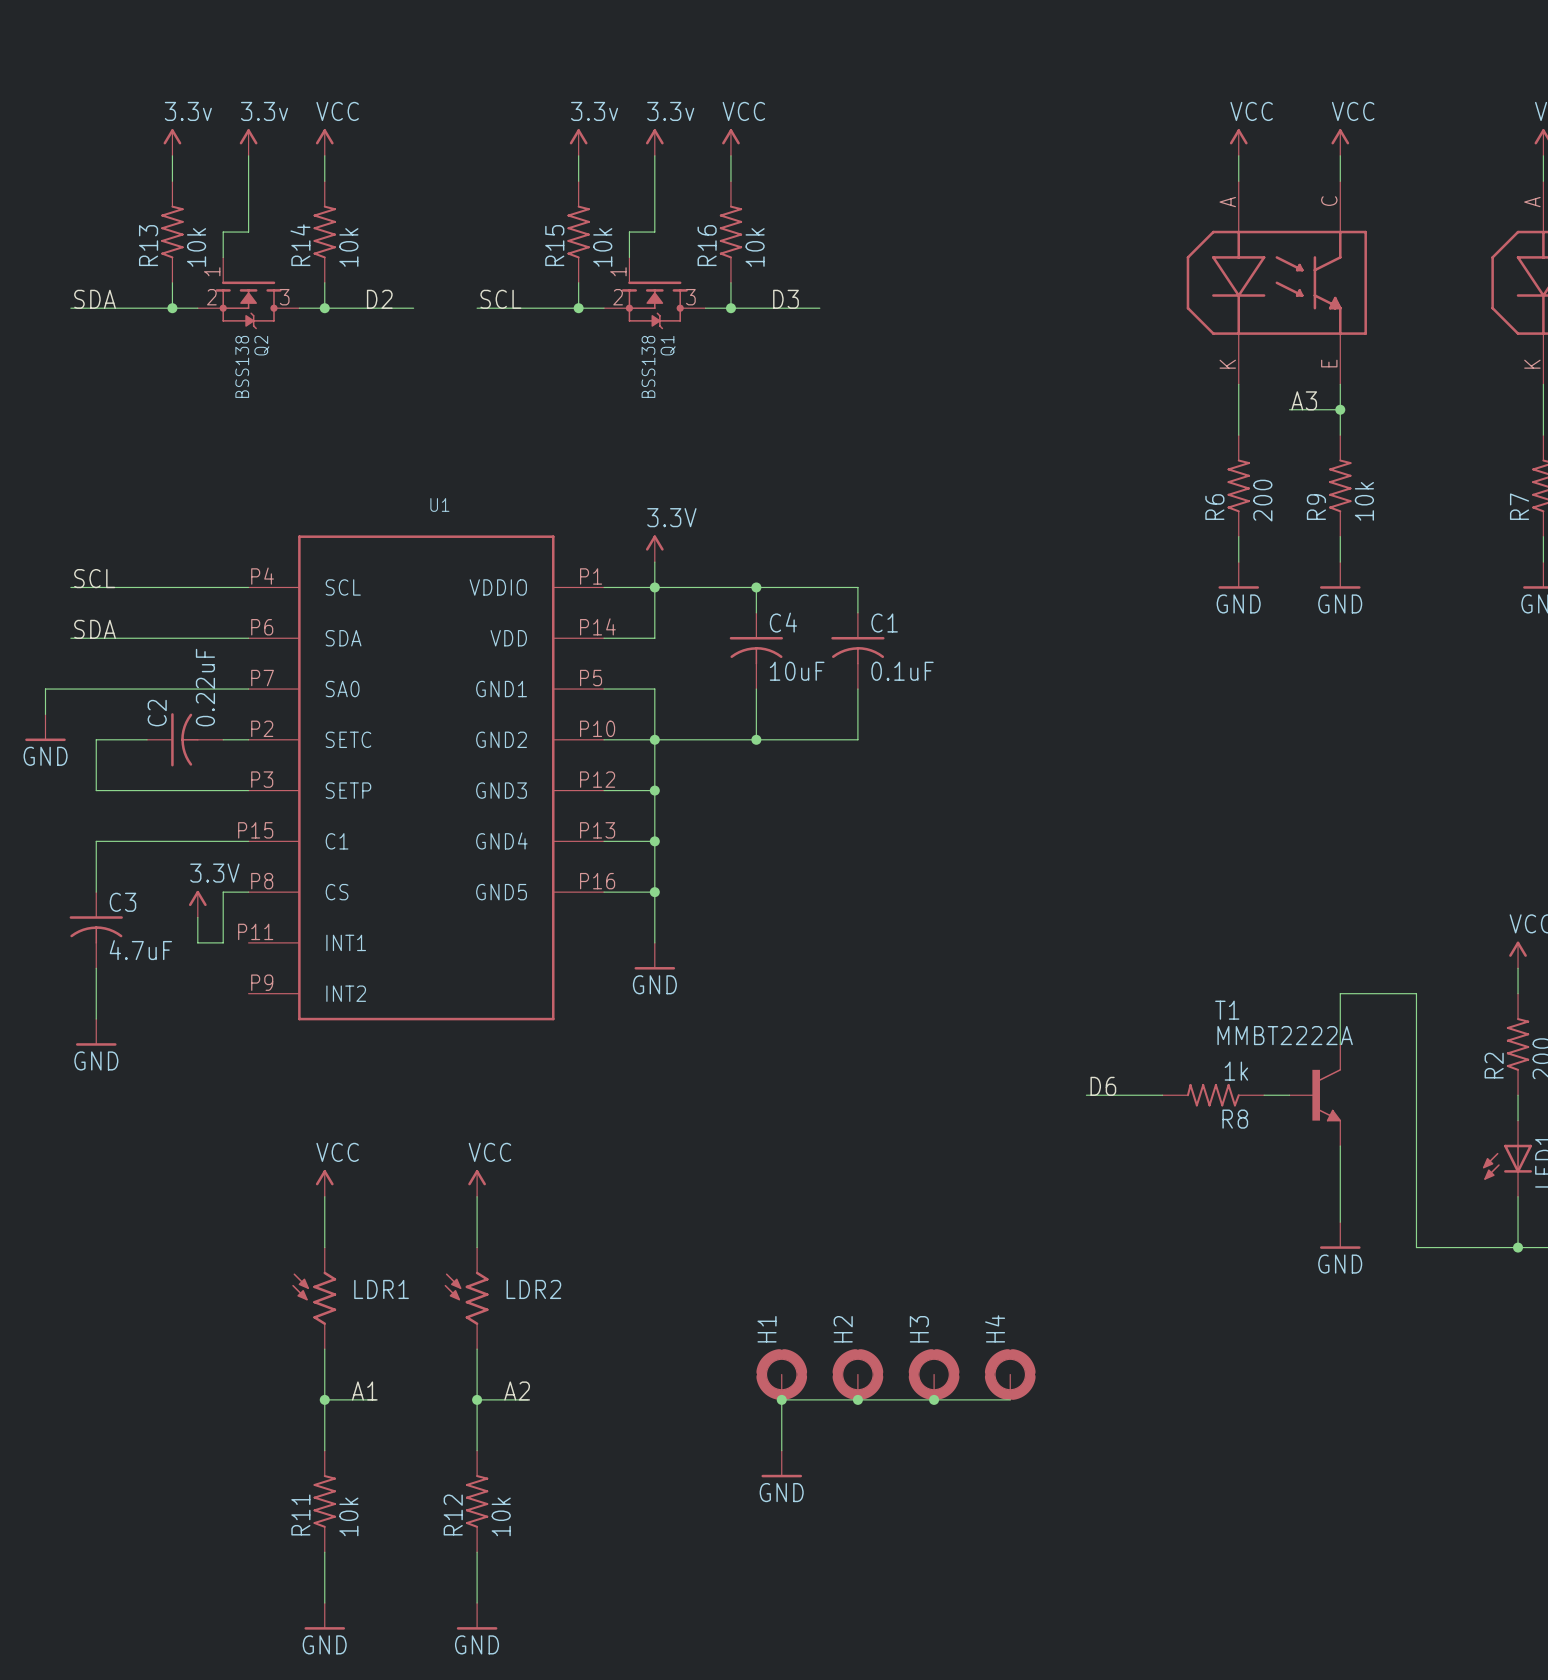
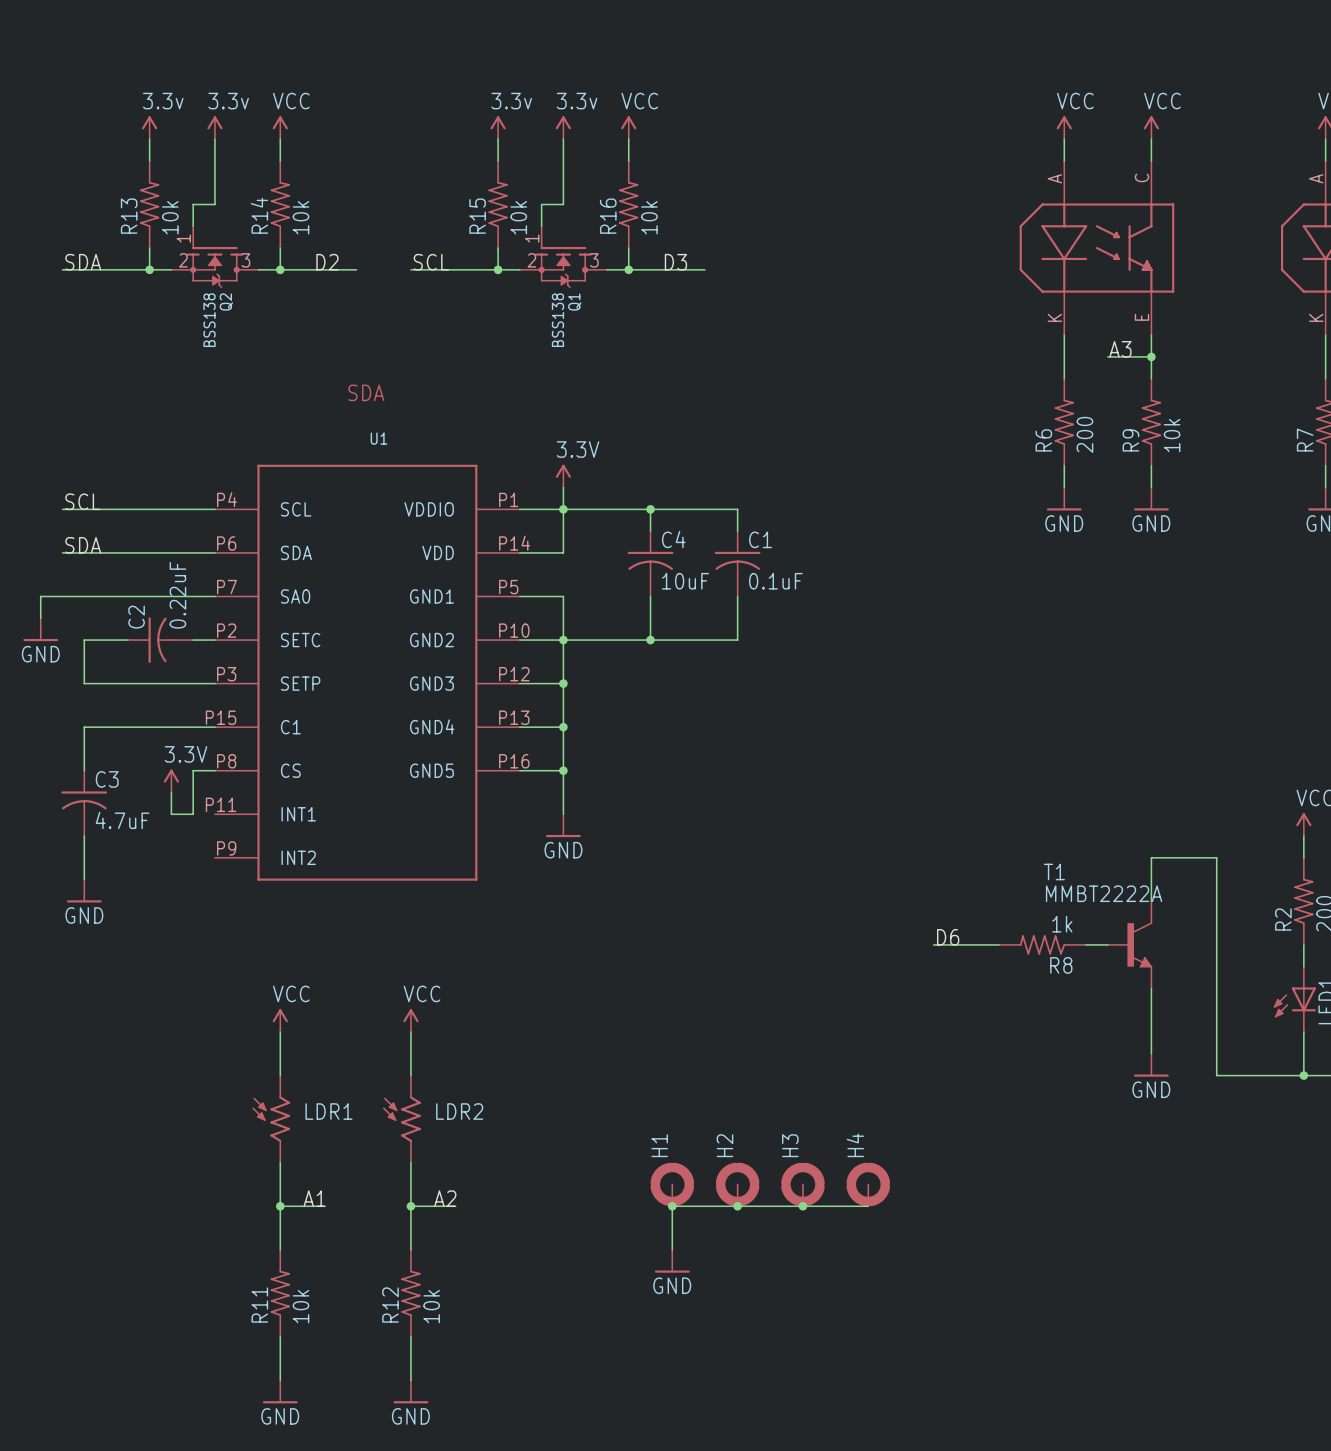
text: none -> SDA (366, 392)

